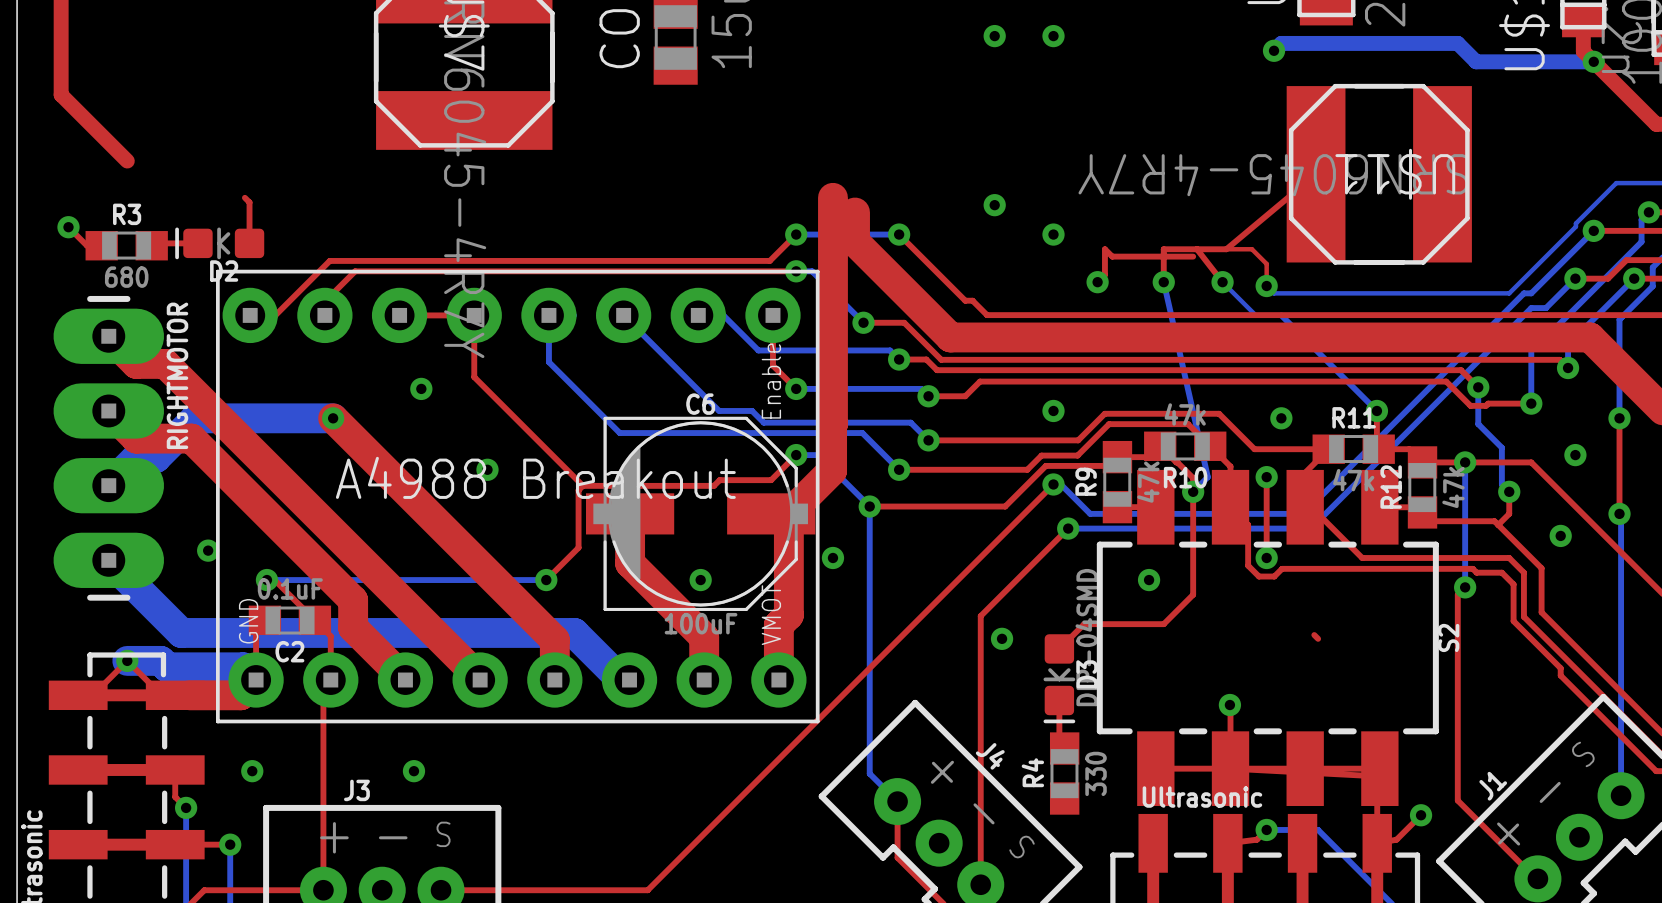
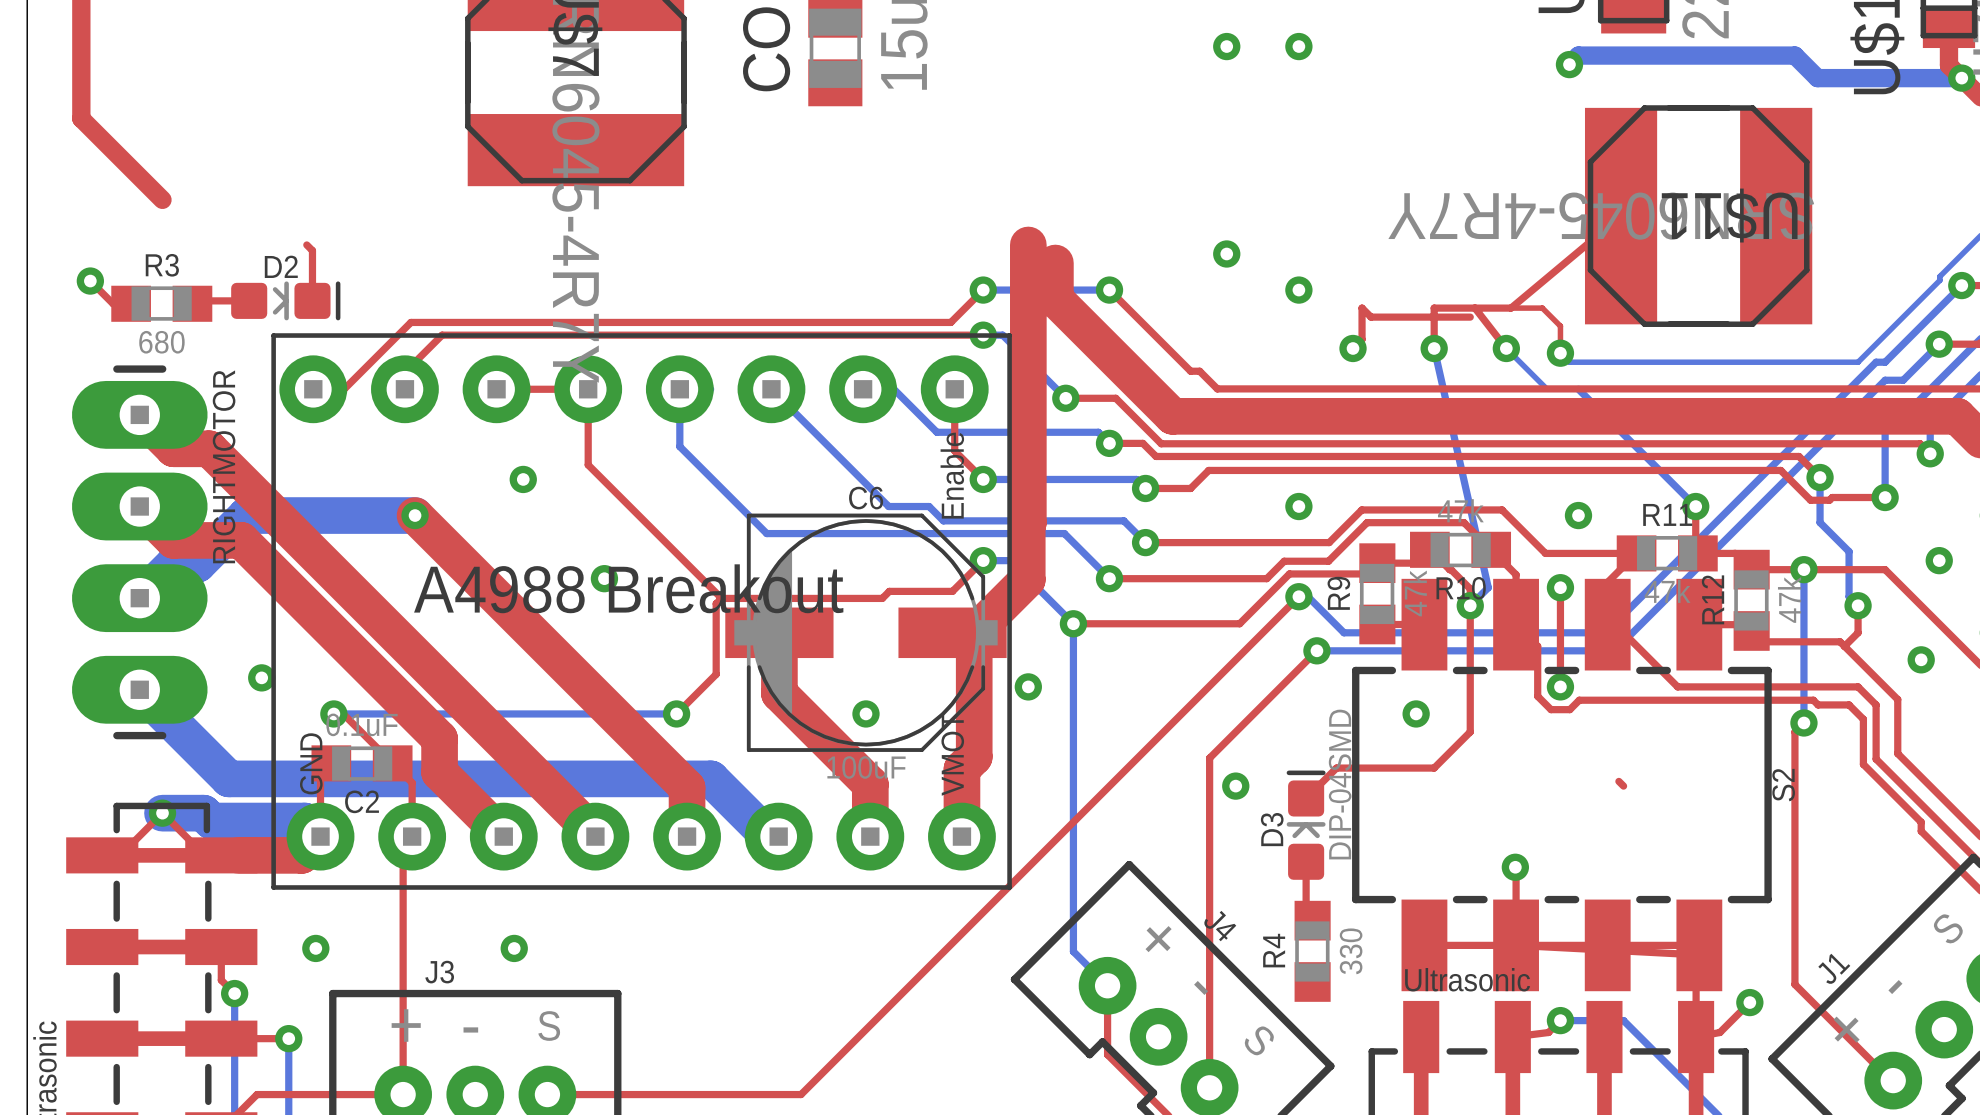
D2 rotation: 0° (219, 243) -> 180° (285, 300)
D3 rotation: 0° (1059, 678) -> 180° (1306, 825)

